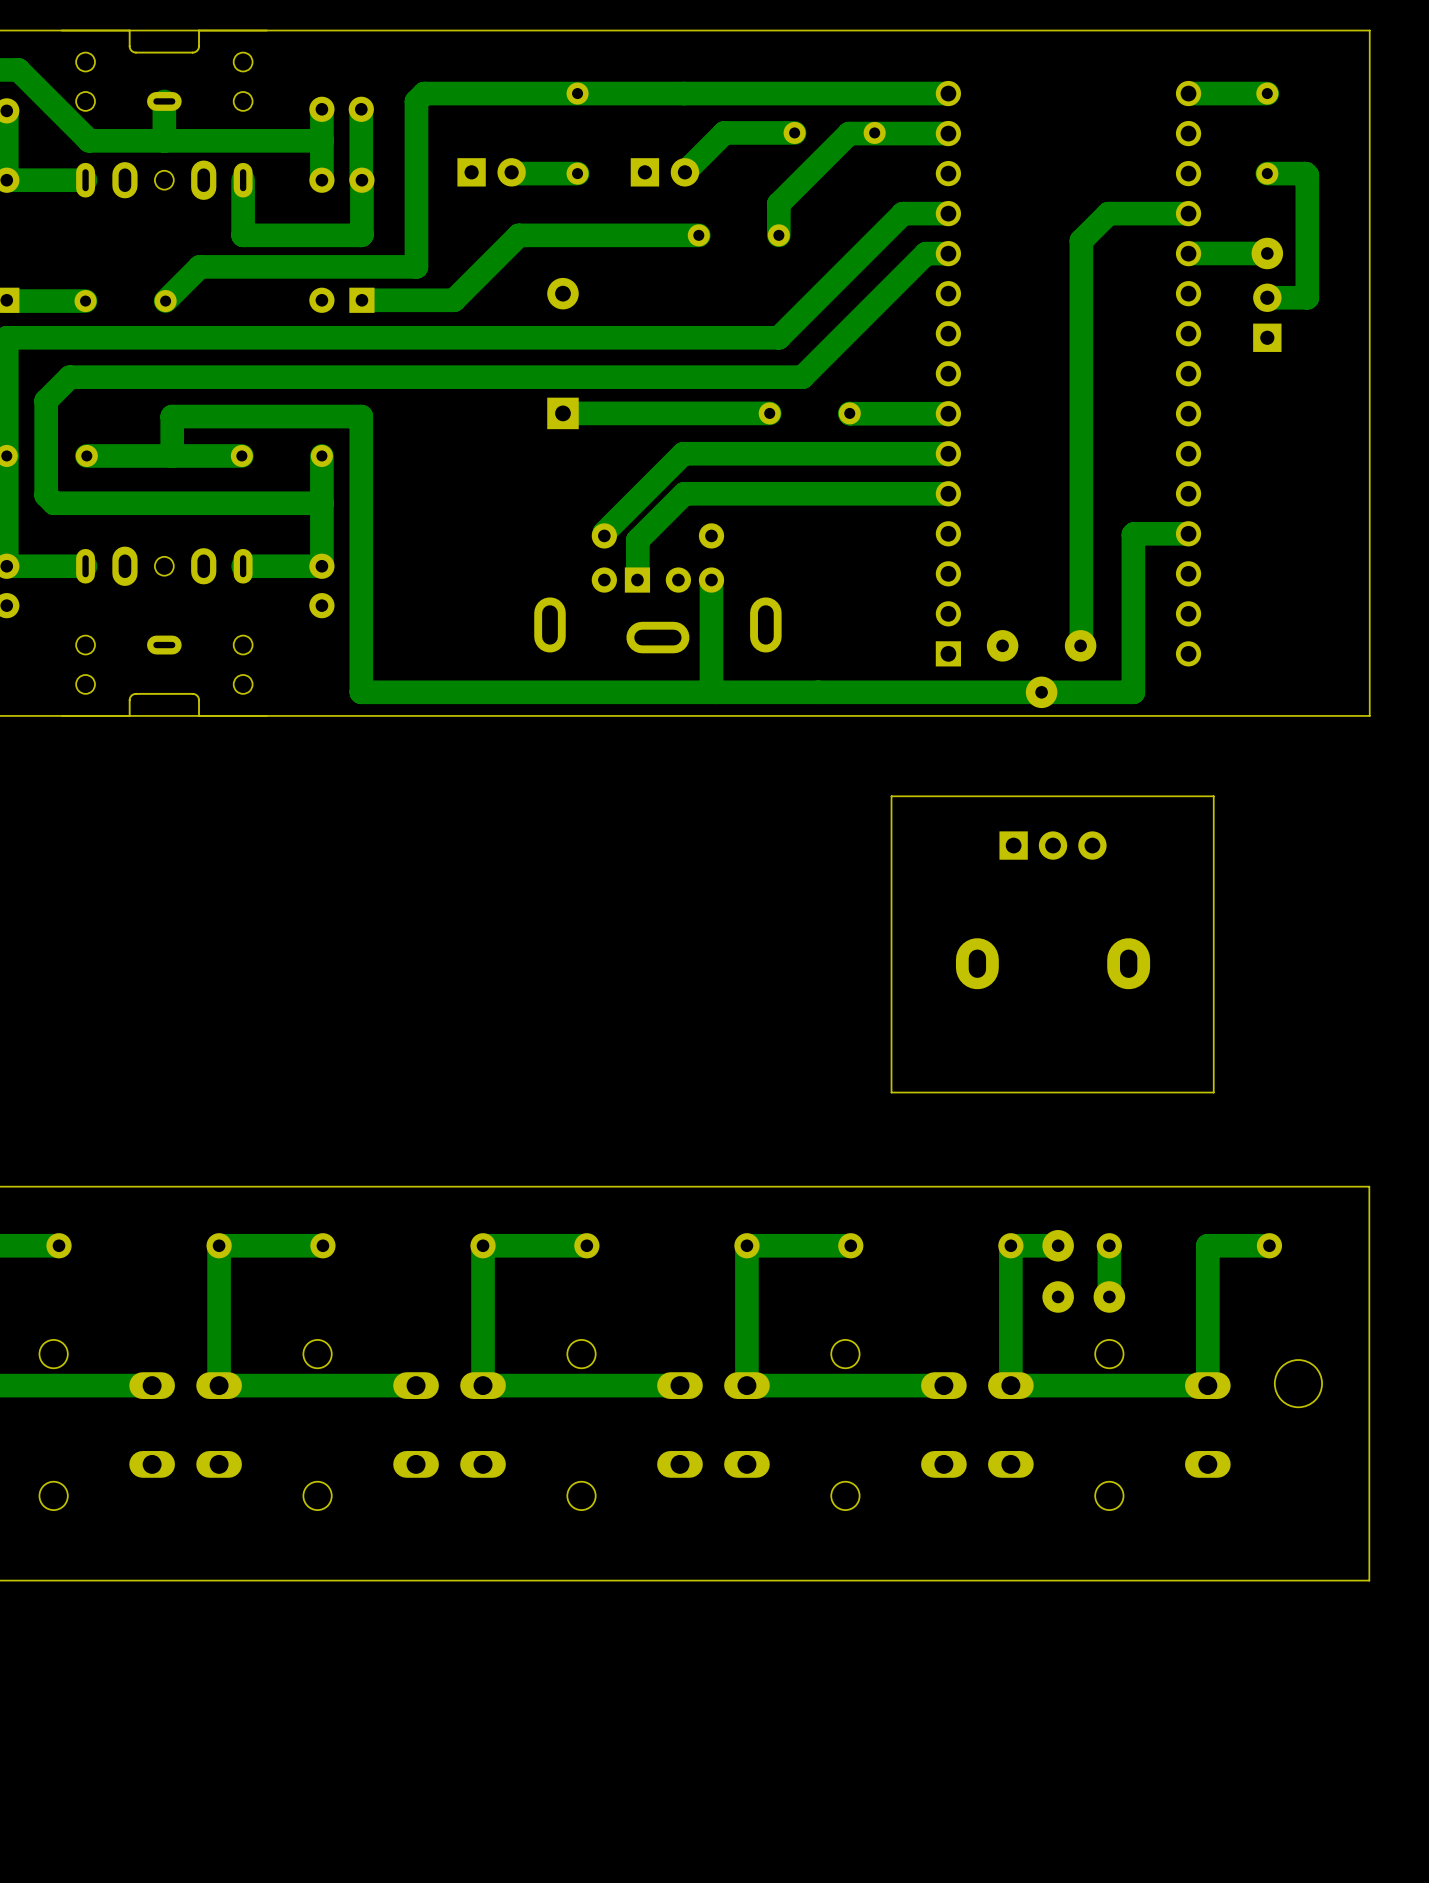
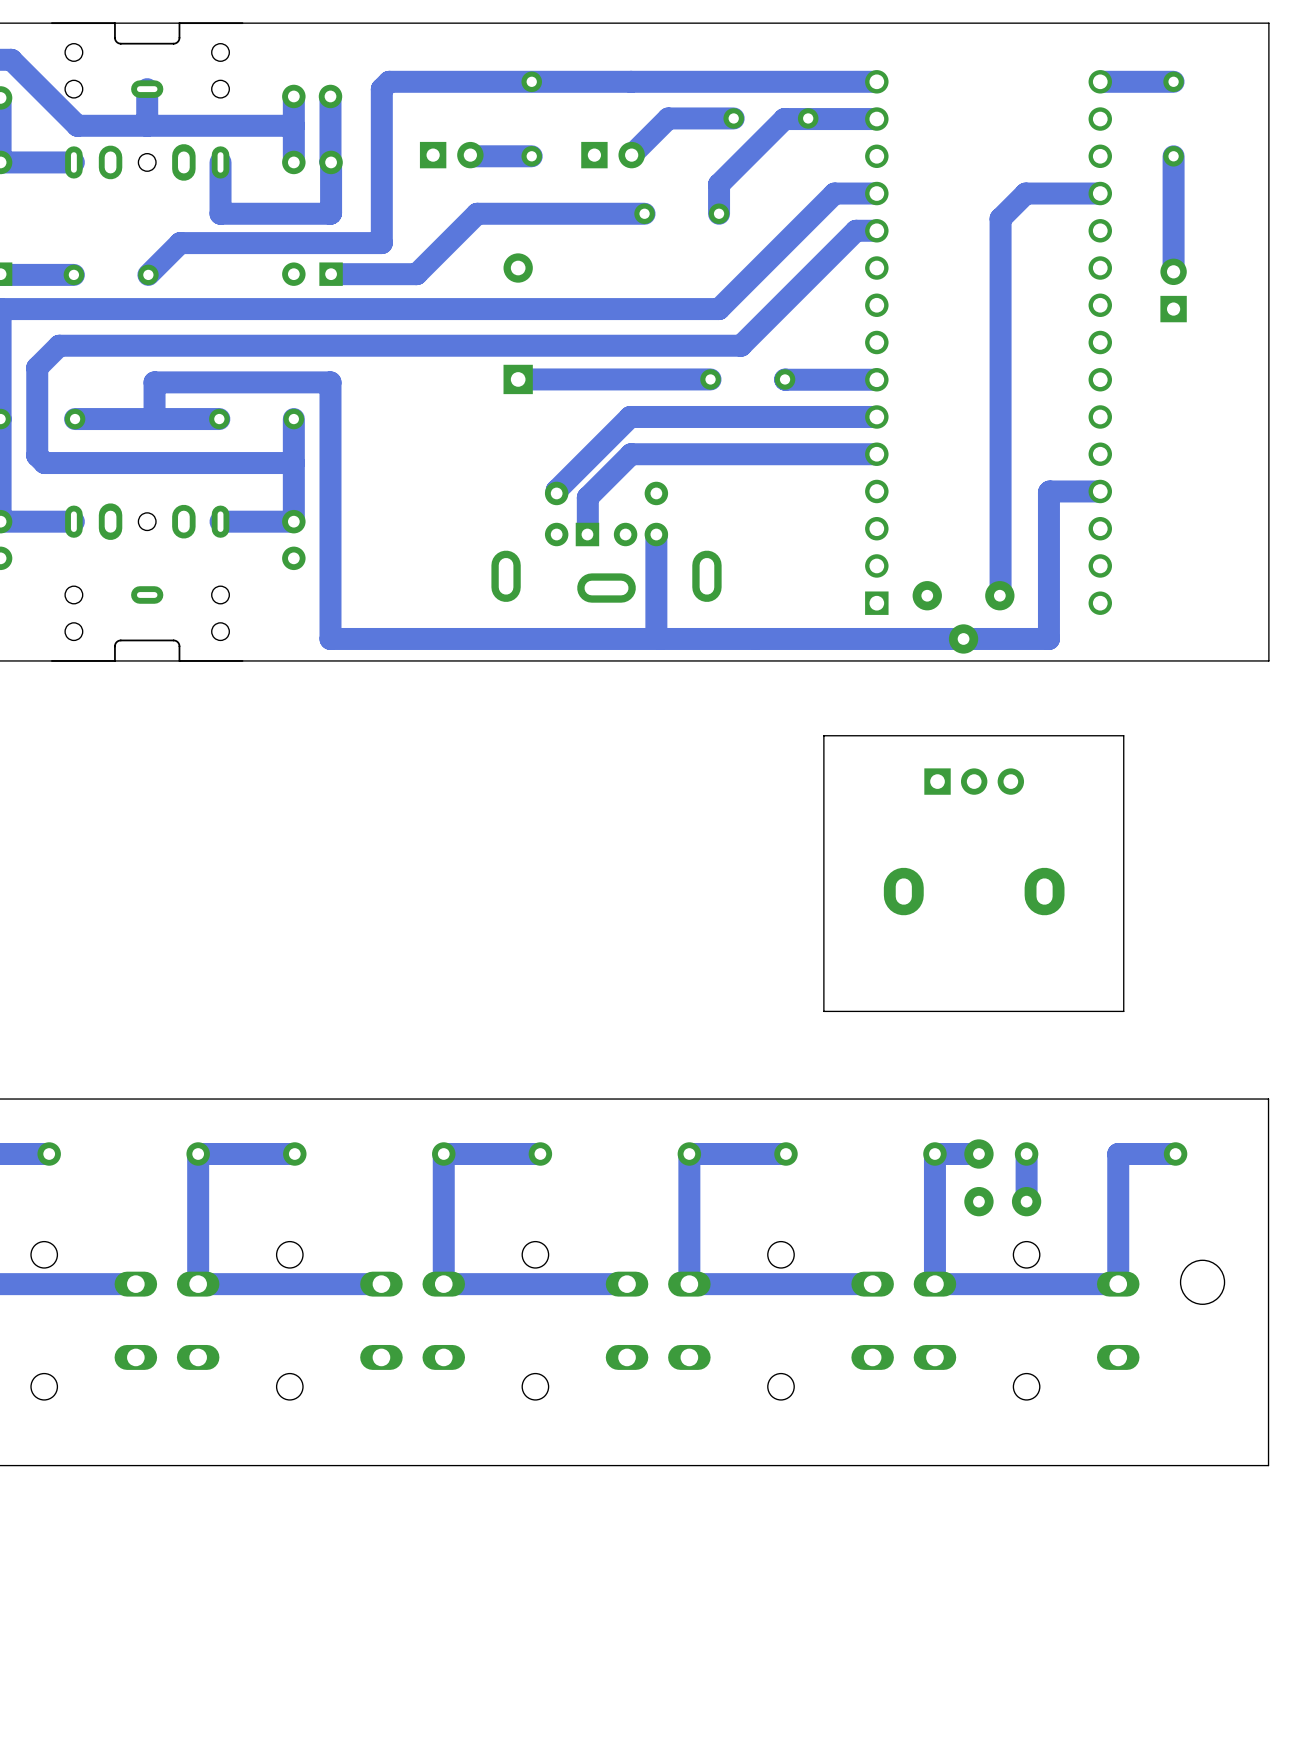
bottom track: (1267, 173) (1305, 173) (1307, 175) (1307, 297) (1267, 297) -> (1173, 156) (1173, 271)
part: (1267, 253) -> none
bottom track: (1268, 253) (1188, 253) -> none

